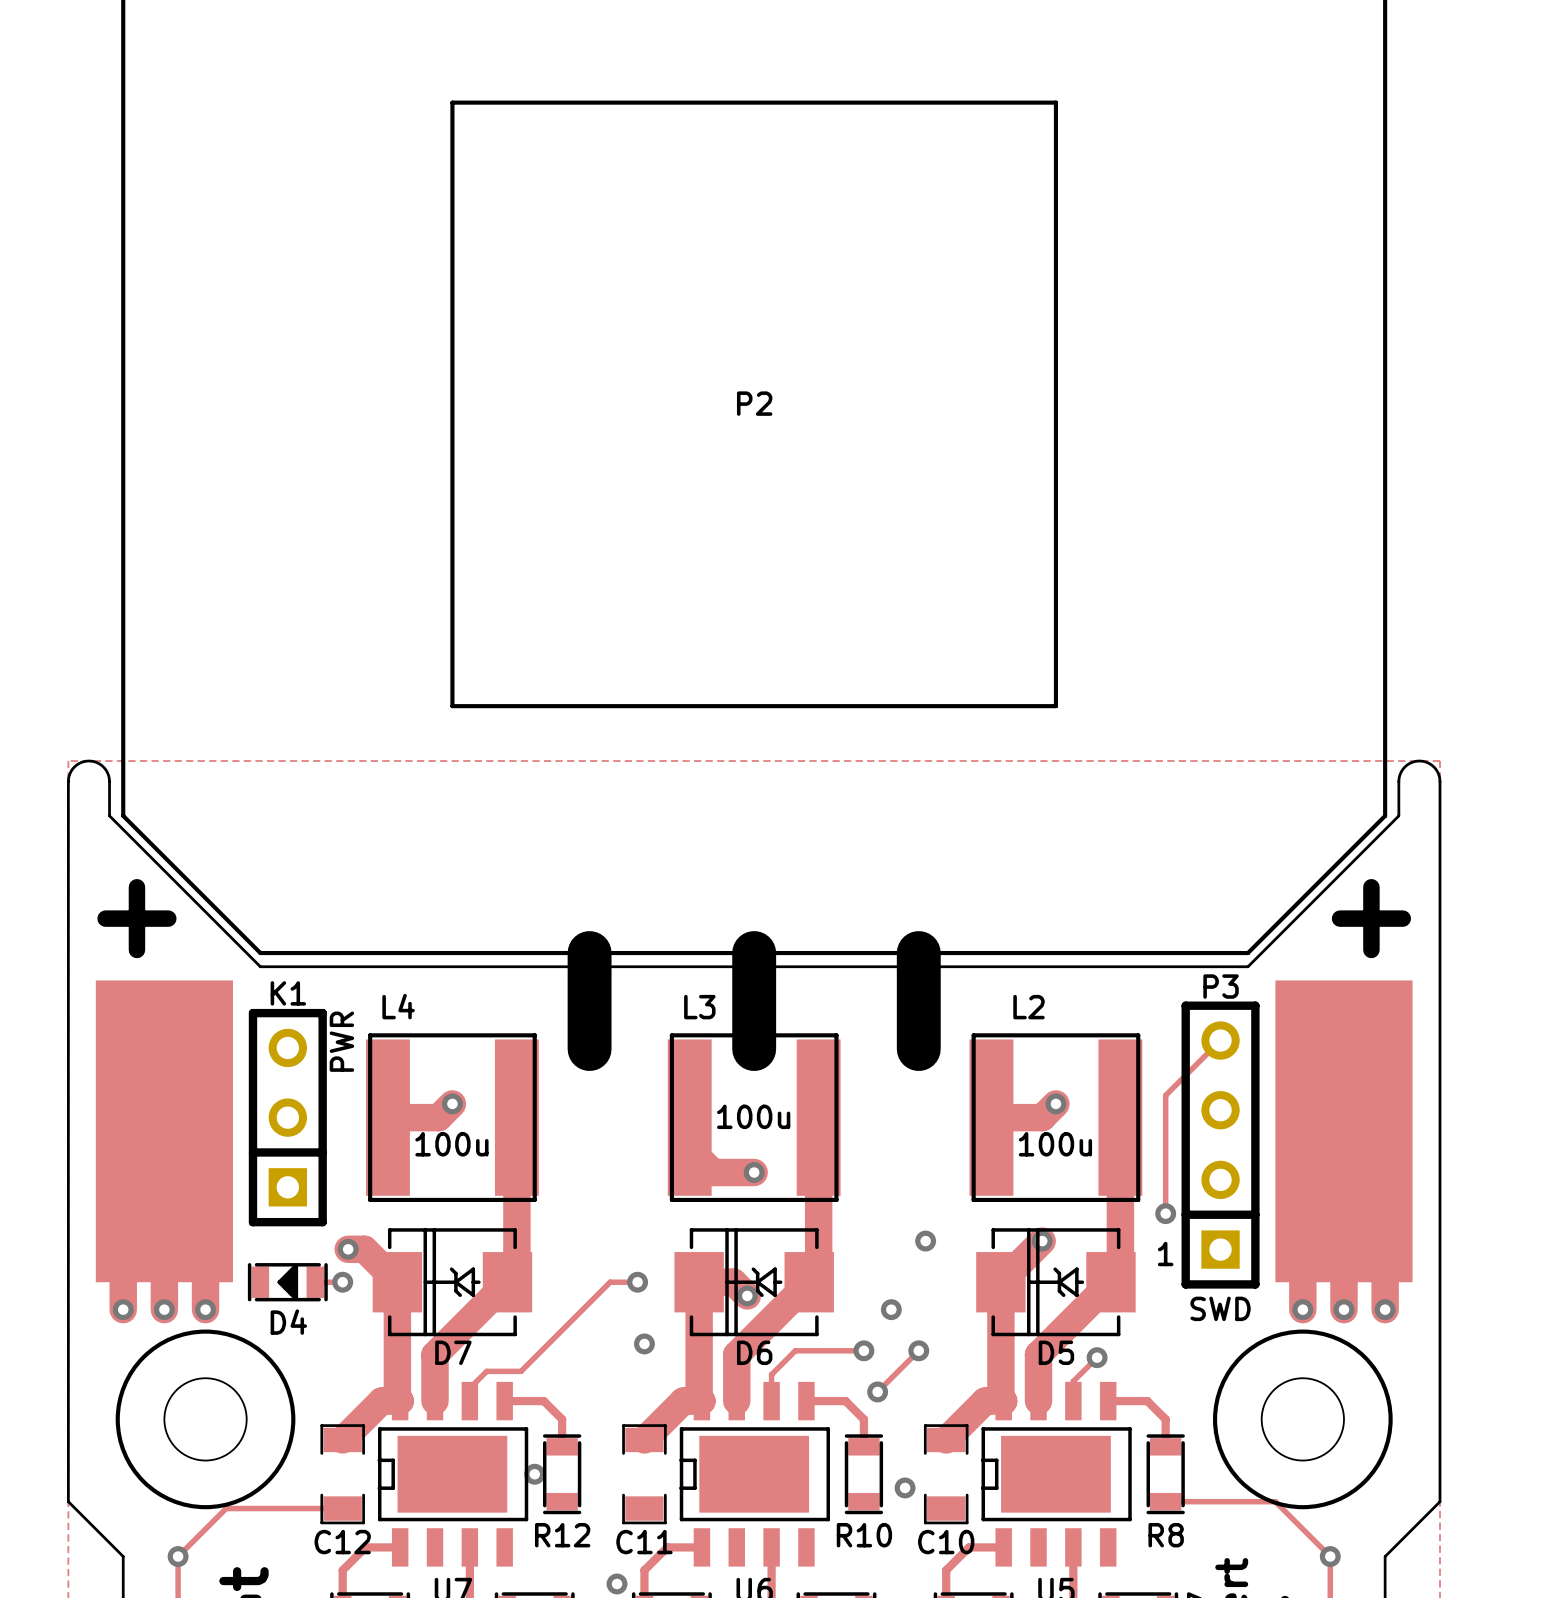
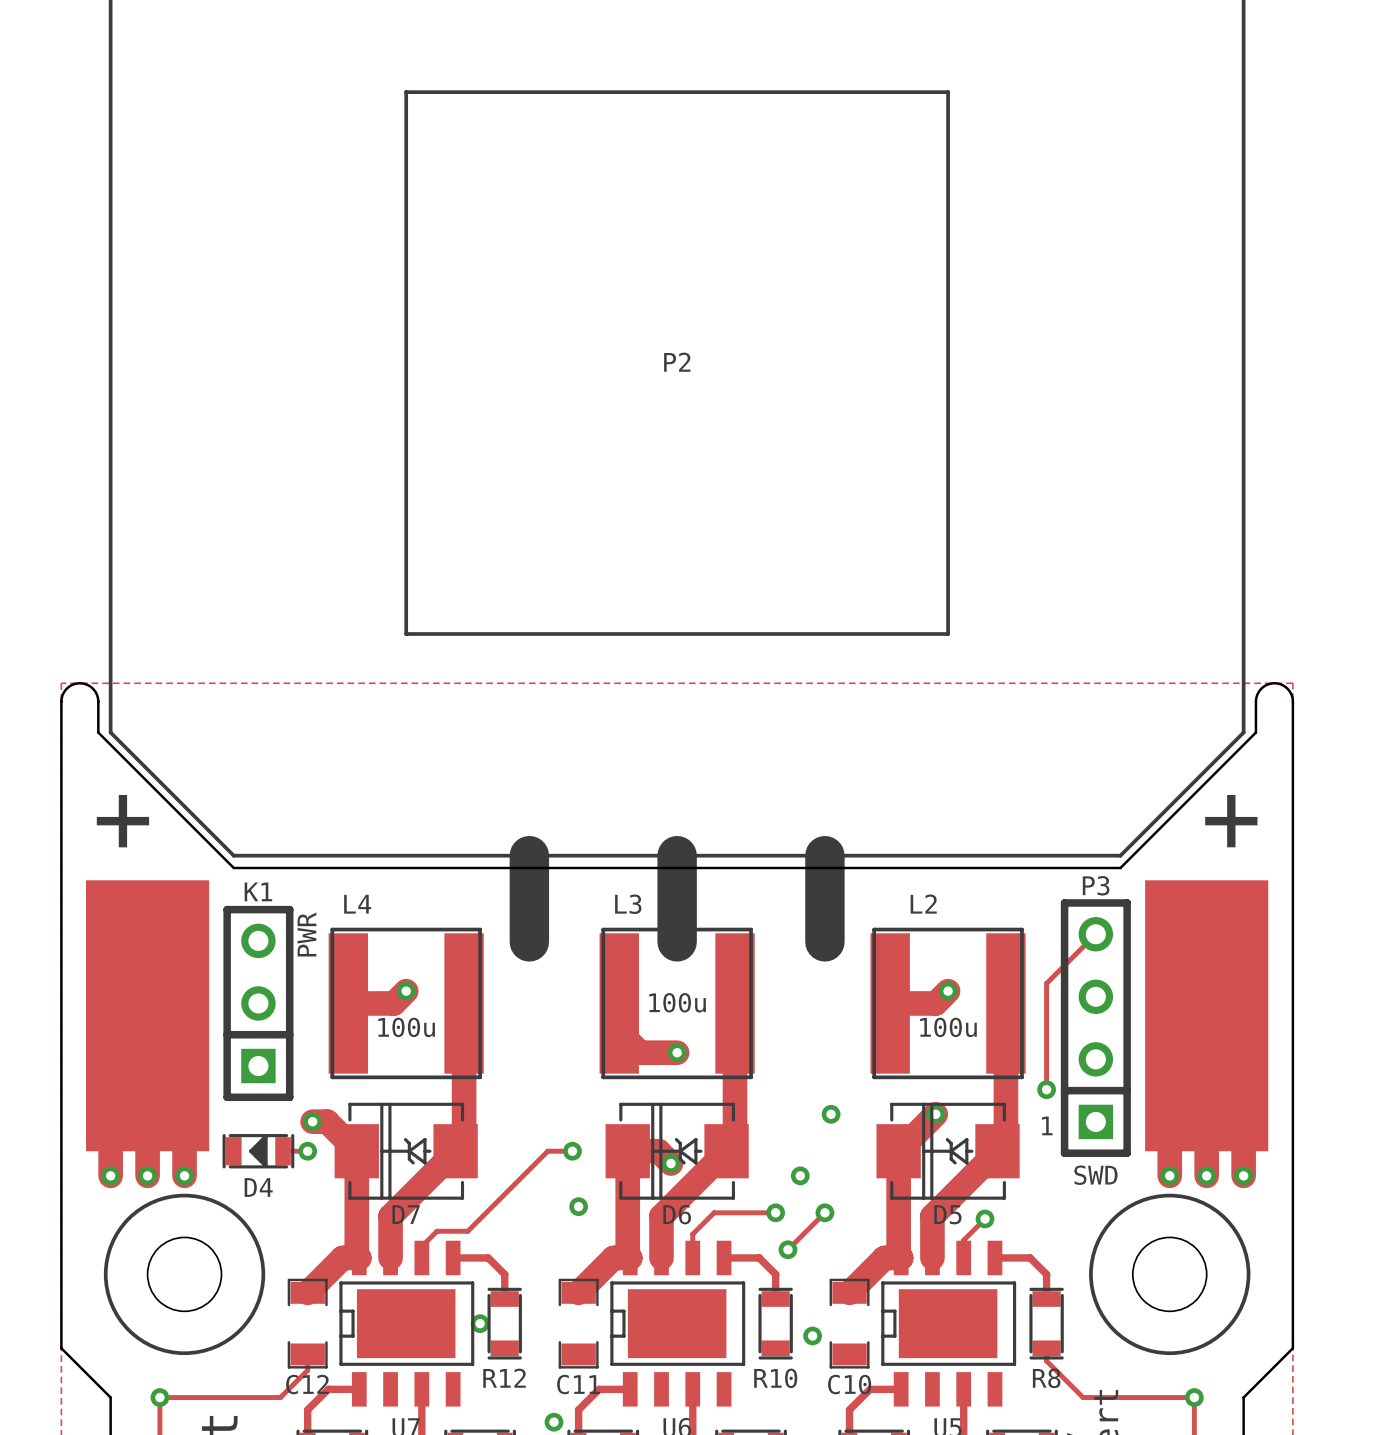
track: (1165, 1501) (1275, 1501) (1330, 1556) -> (1046, 1348) (1046, 1361) (1083, 1397) (1194, 1397)
track: (342, 1508) (226, 1508) (178, 1556) -> (307, 1354) (307, 1370) (280, 1397) (159, 1397)

